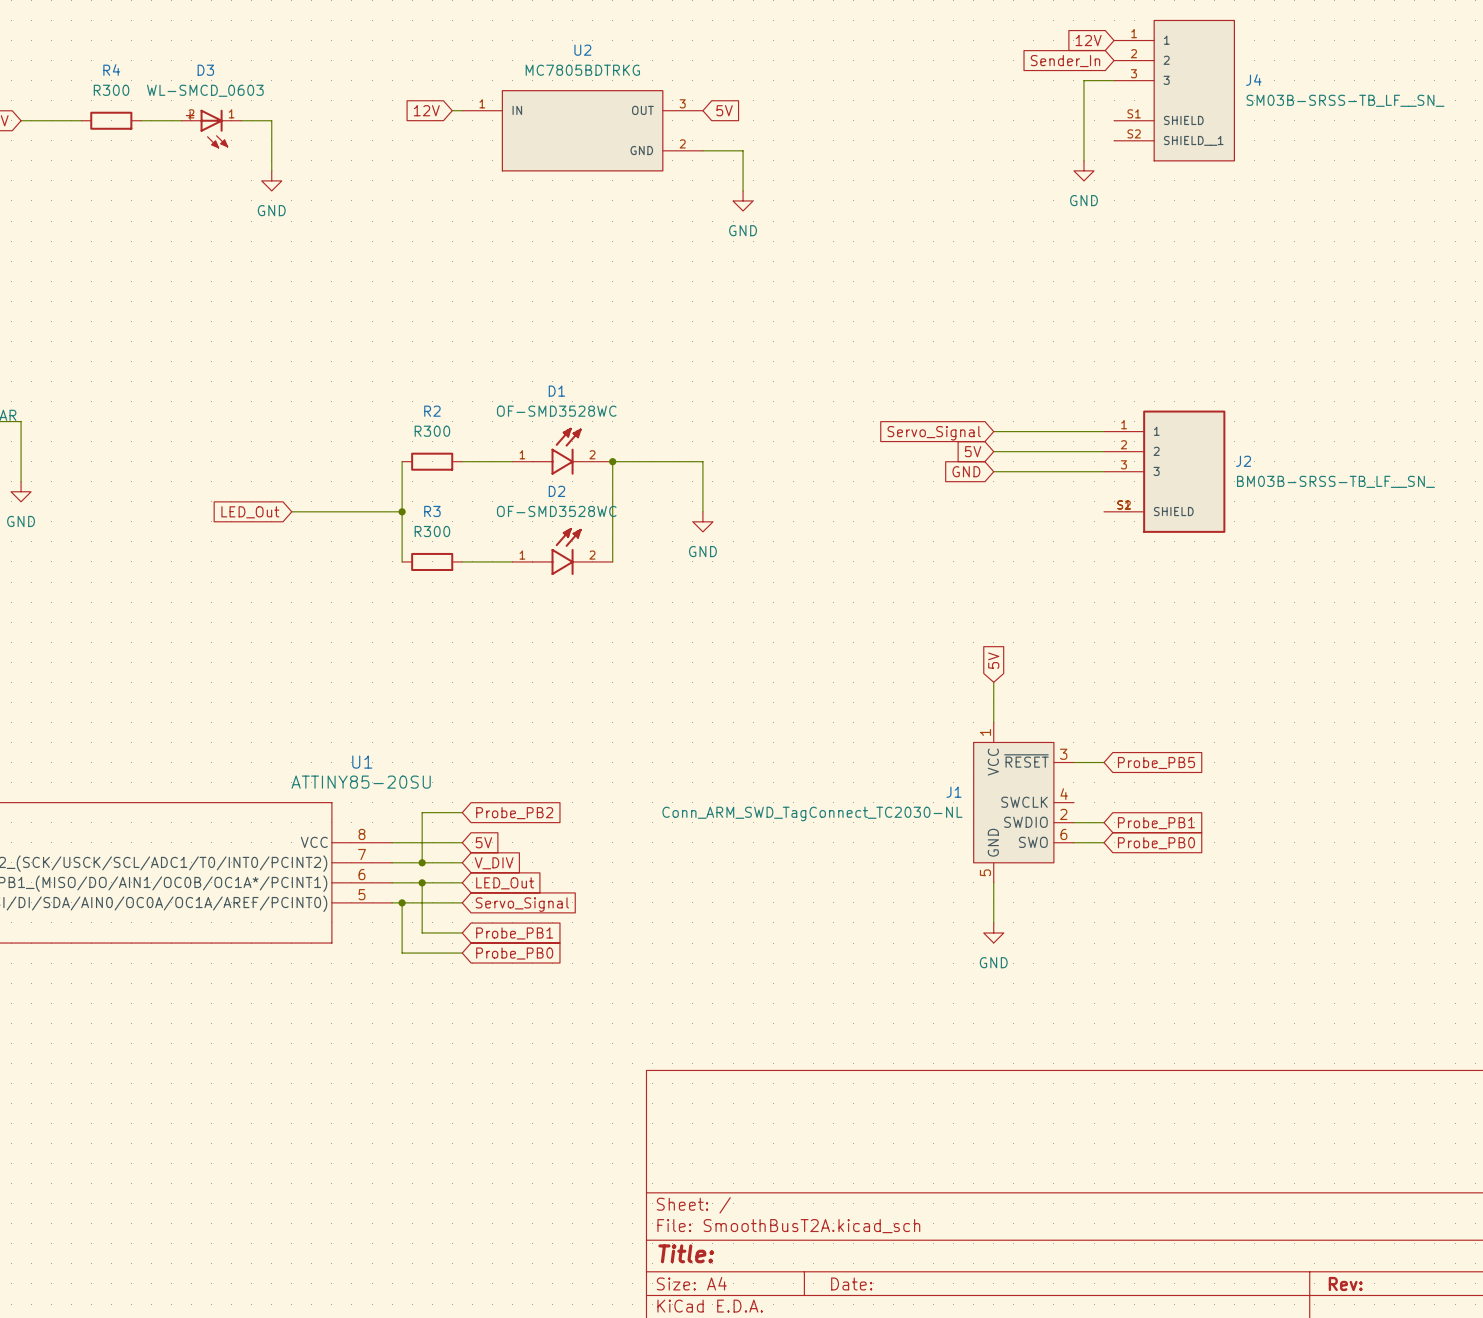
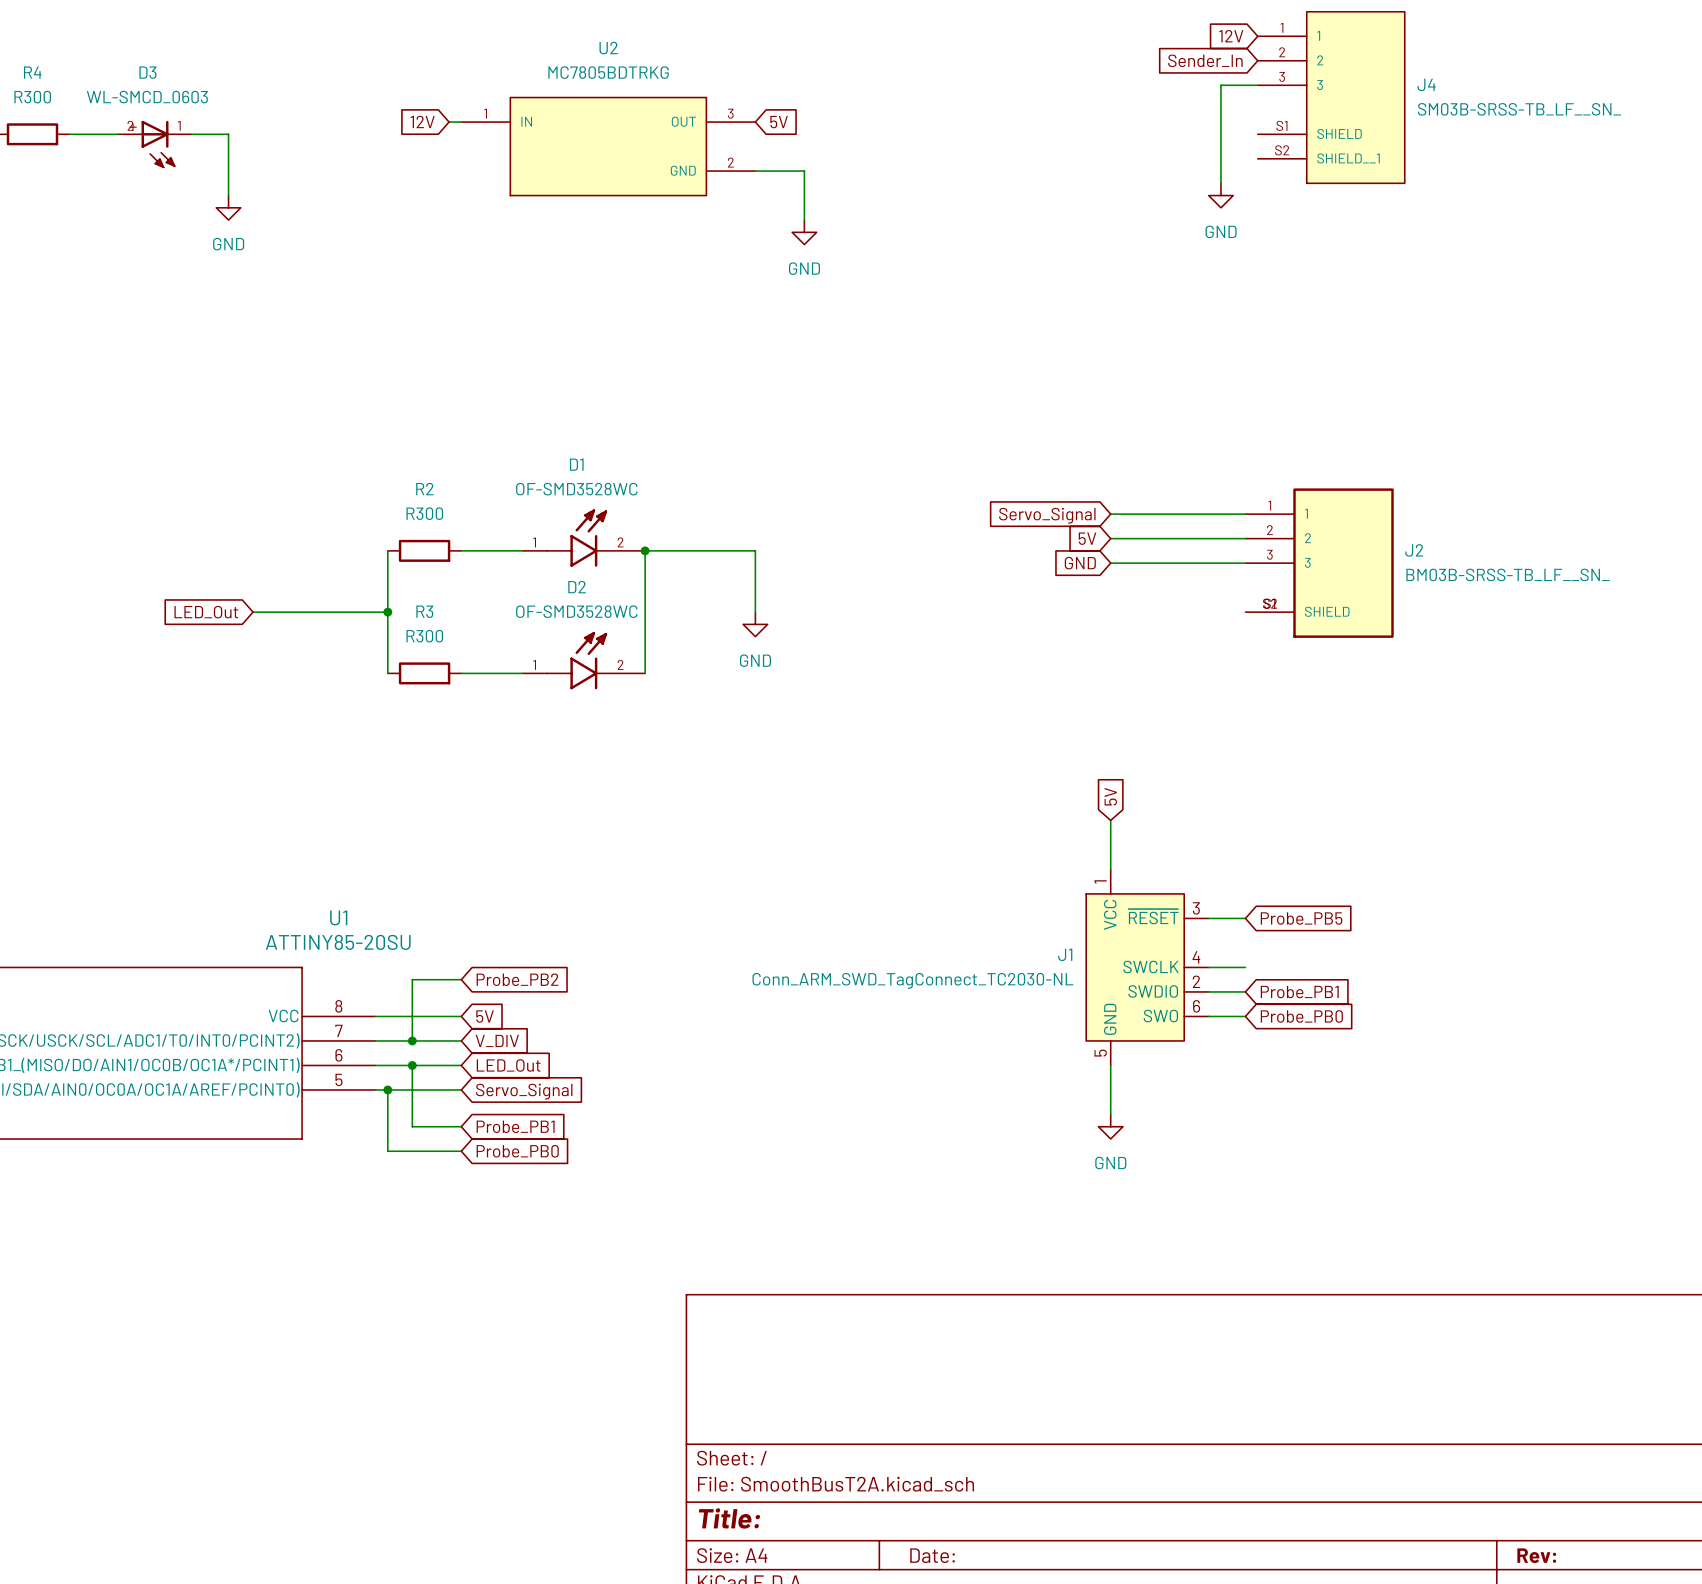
wire: none -> (1208, 967) (1245, 967)

